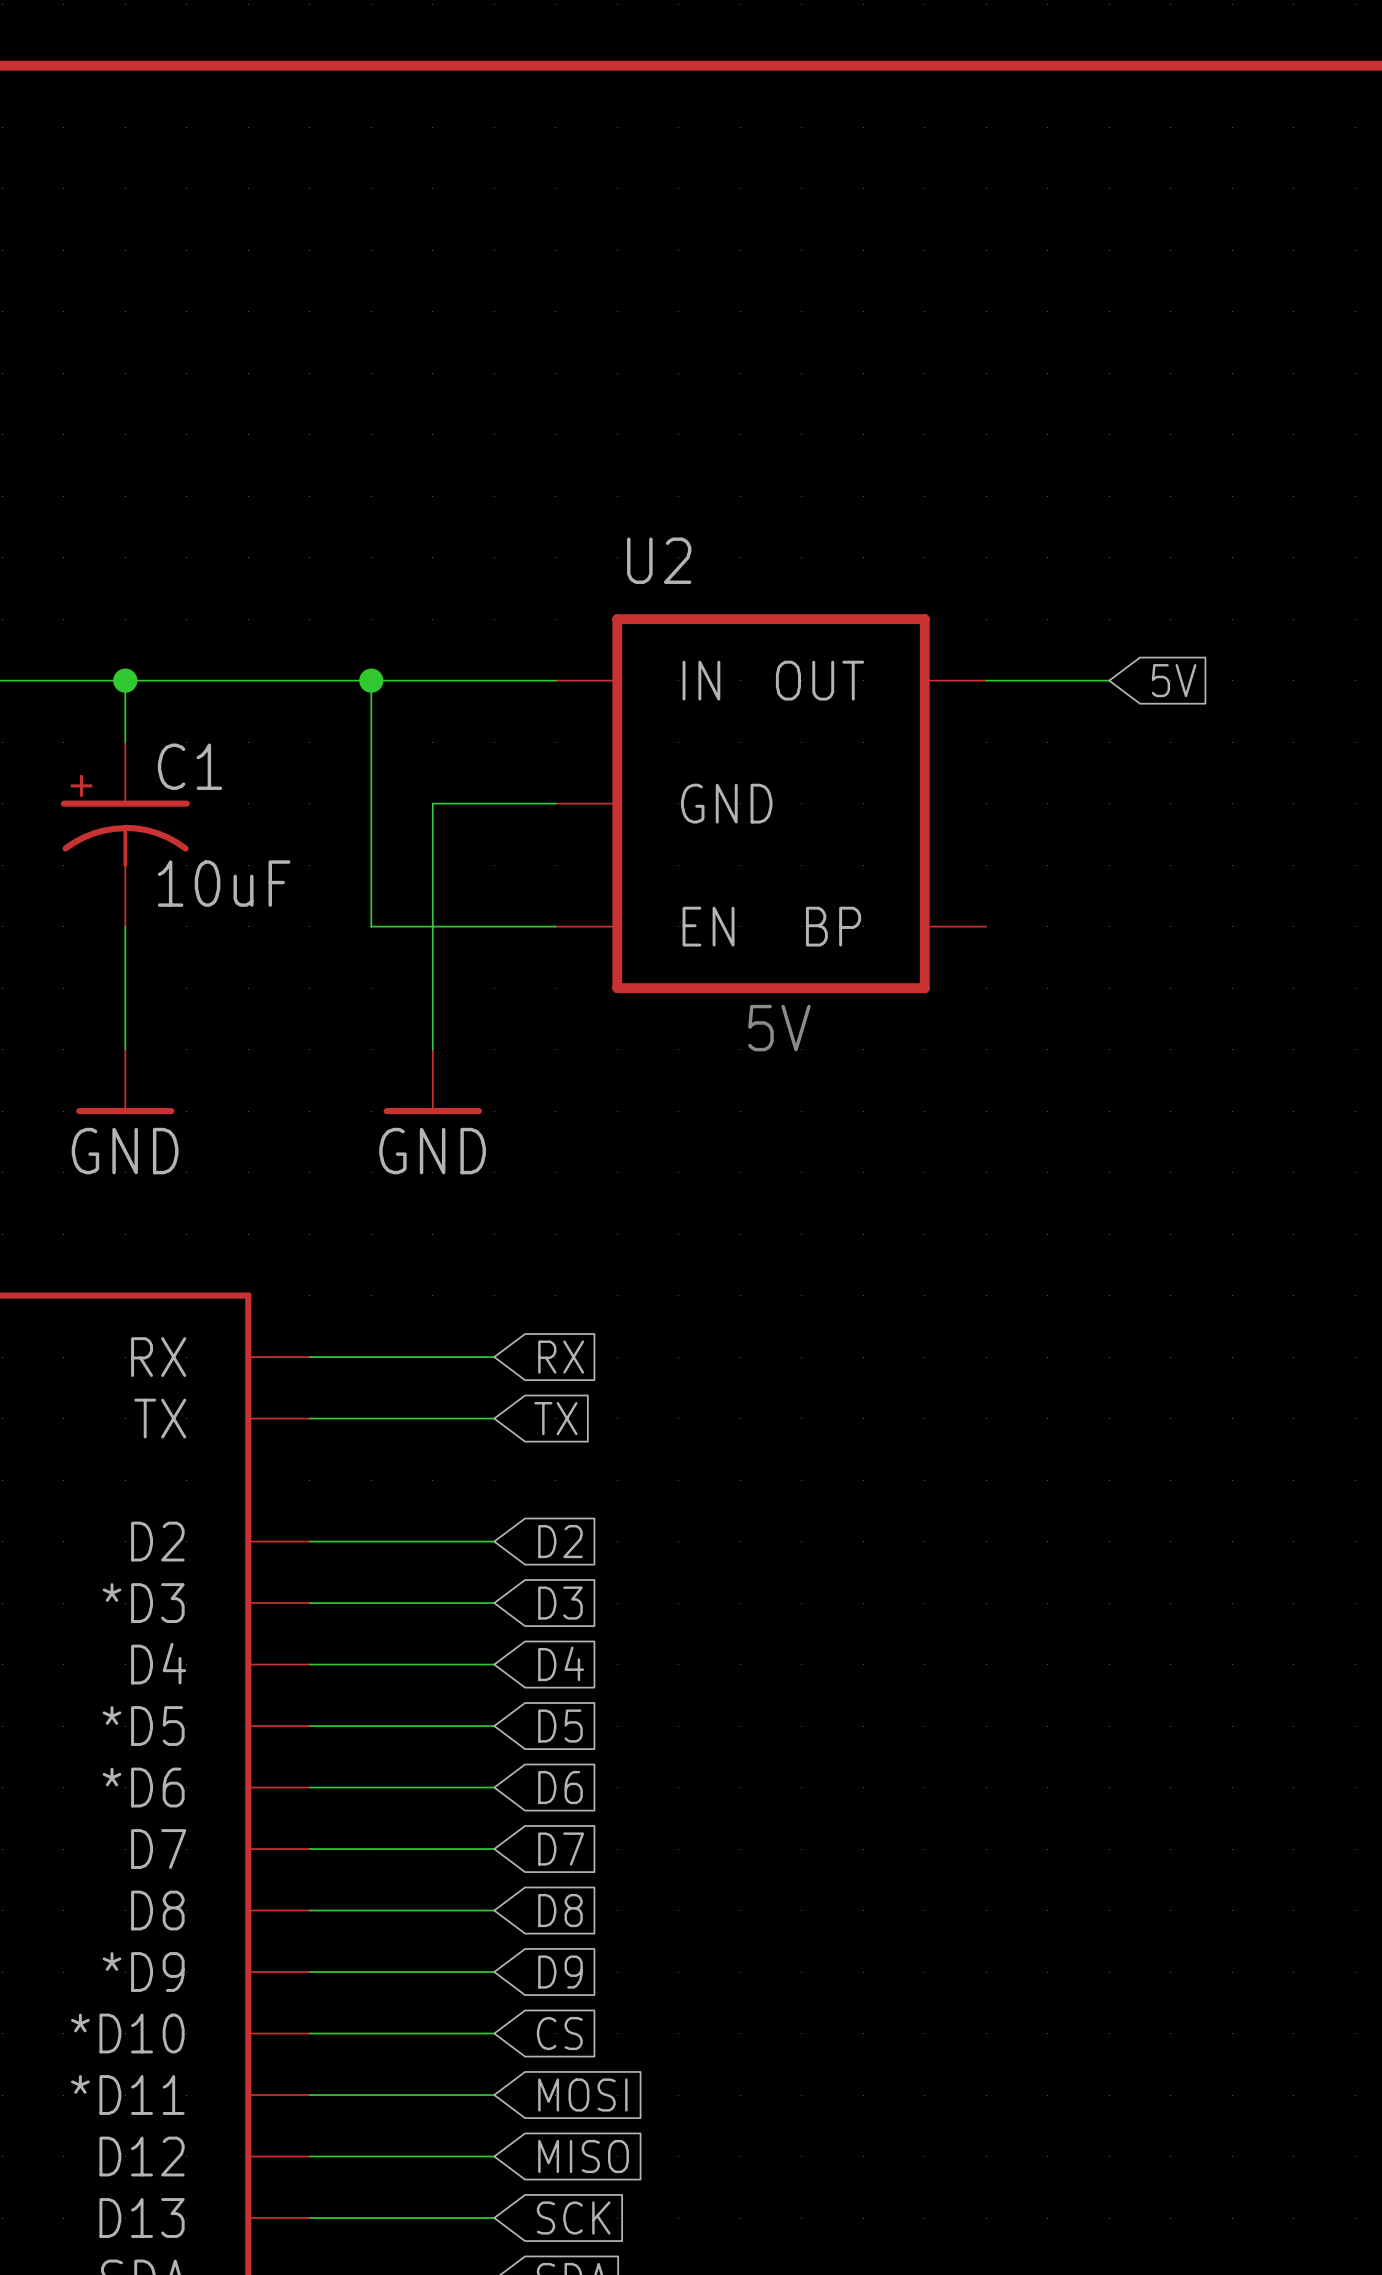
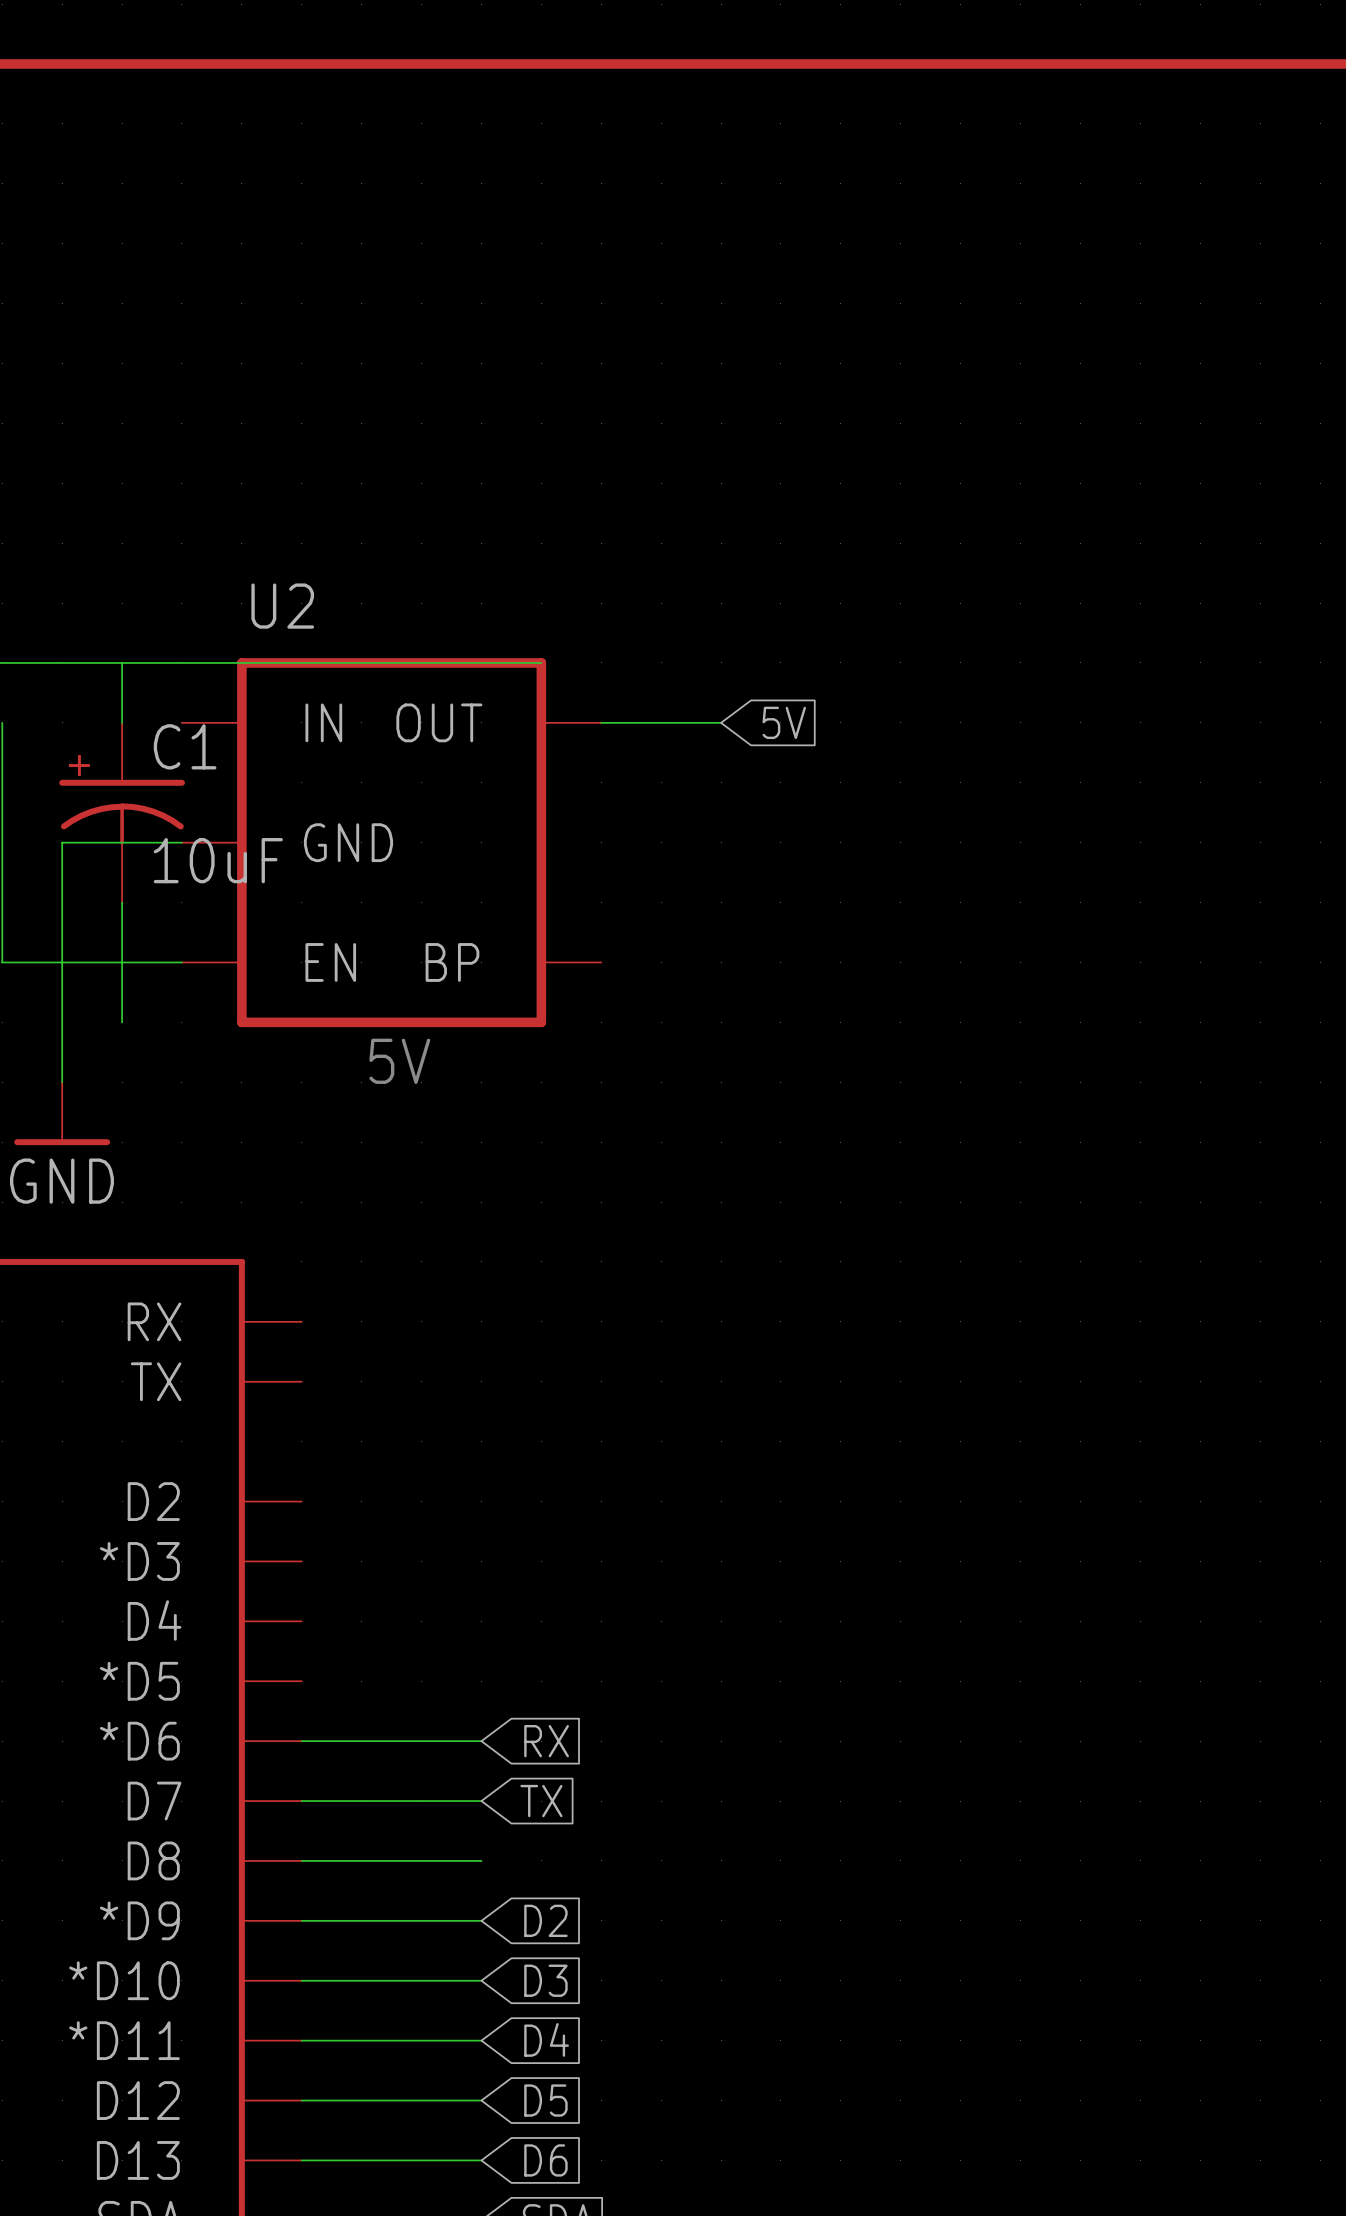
junction: (125, 680) -> none
wire: (371, 680) (371, 926) (555, 926) -> (2, 722) (2, 962) (181, 962)
junction: (371, 680) -> none
wire: (986, 680) (1109, 680) -> (601, 722) (721, 722)
global label position: 5V (1174, 680) -> 5V (784, 722)
wire: (555, 803) (432, 803) (432, 1049) -> (181, 842) (62, 842) (62, 1082)
U2 position: (771, 803) -> (391, 842)
text position: 5V (779, 1028) -> 5V (399, 1061)
power symbol position: GND (125, 1081) -> GND (62, 1113)
power symbol: GND (432, 1081) -> none
wire: (309, 1357) (494, 1357) -> none
global label: RX (561, 1357) -> none
wire: (309, 1418) (494, 1418) -> none
global label: TX (555, 1418) -> none
wire: (309, 1541) (494, 1541) -> none
global label: D2 (560, 1541) -> none
wire: (309, 1603) (494, 1603) -> none
global label: D3 (560, 1603) -> none
global label: D4 (561, 1663) -> none
wire: (309, 1664) (494, 1664) -> none
wire: (309, 1726) (494, 1726) -> none
global label: D5 (560, 1726) -> none
global label: D6 (560, 1787) -> RX (546, 1741)
global label: D7 (561, 1849) -> TX (541, 1801)
global label: D8 (560, 1910) -> none
global label: D9 (560, 1972) -> D2 (545, 1920)
global label: CS (559, 2033) -> D3 (545, 1980)
global label: MOSI (582, 2095) -> D4 (546, 2039)
global label: MISO (583, 2156) -> D5 (545, 2100)
global label: SCK (573, 2218) -> D6 (545, 2160)

